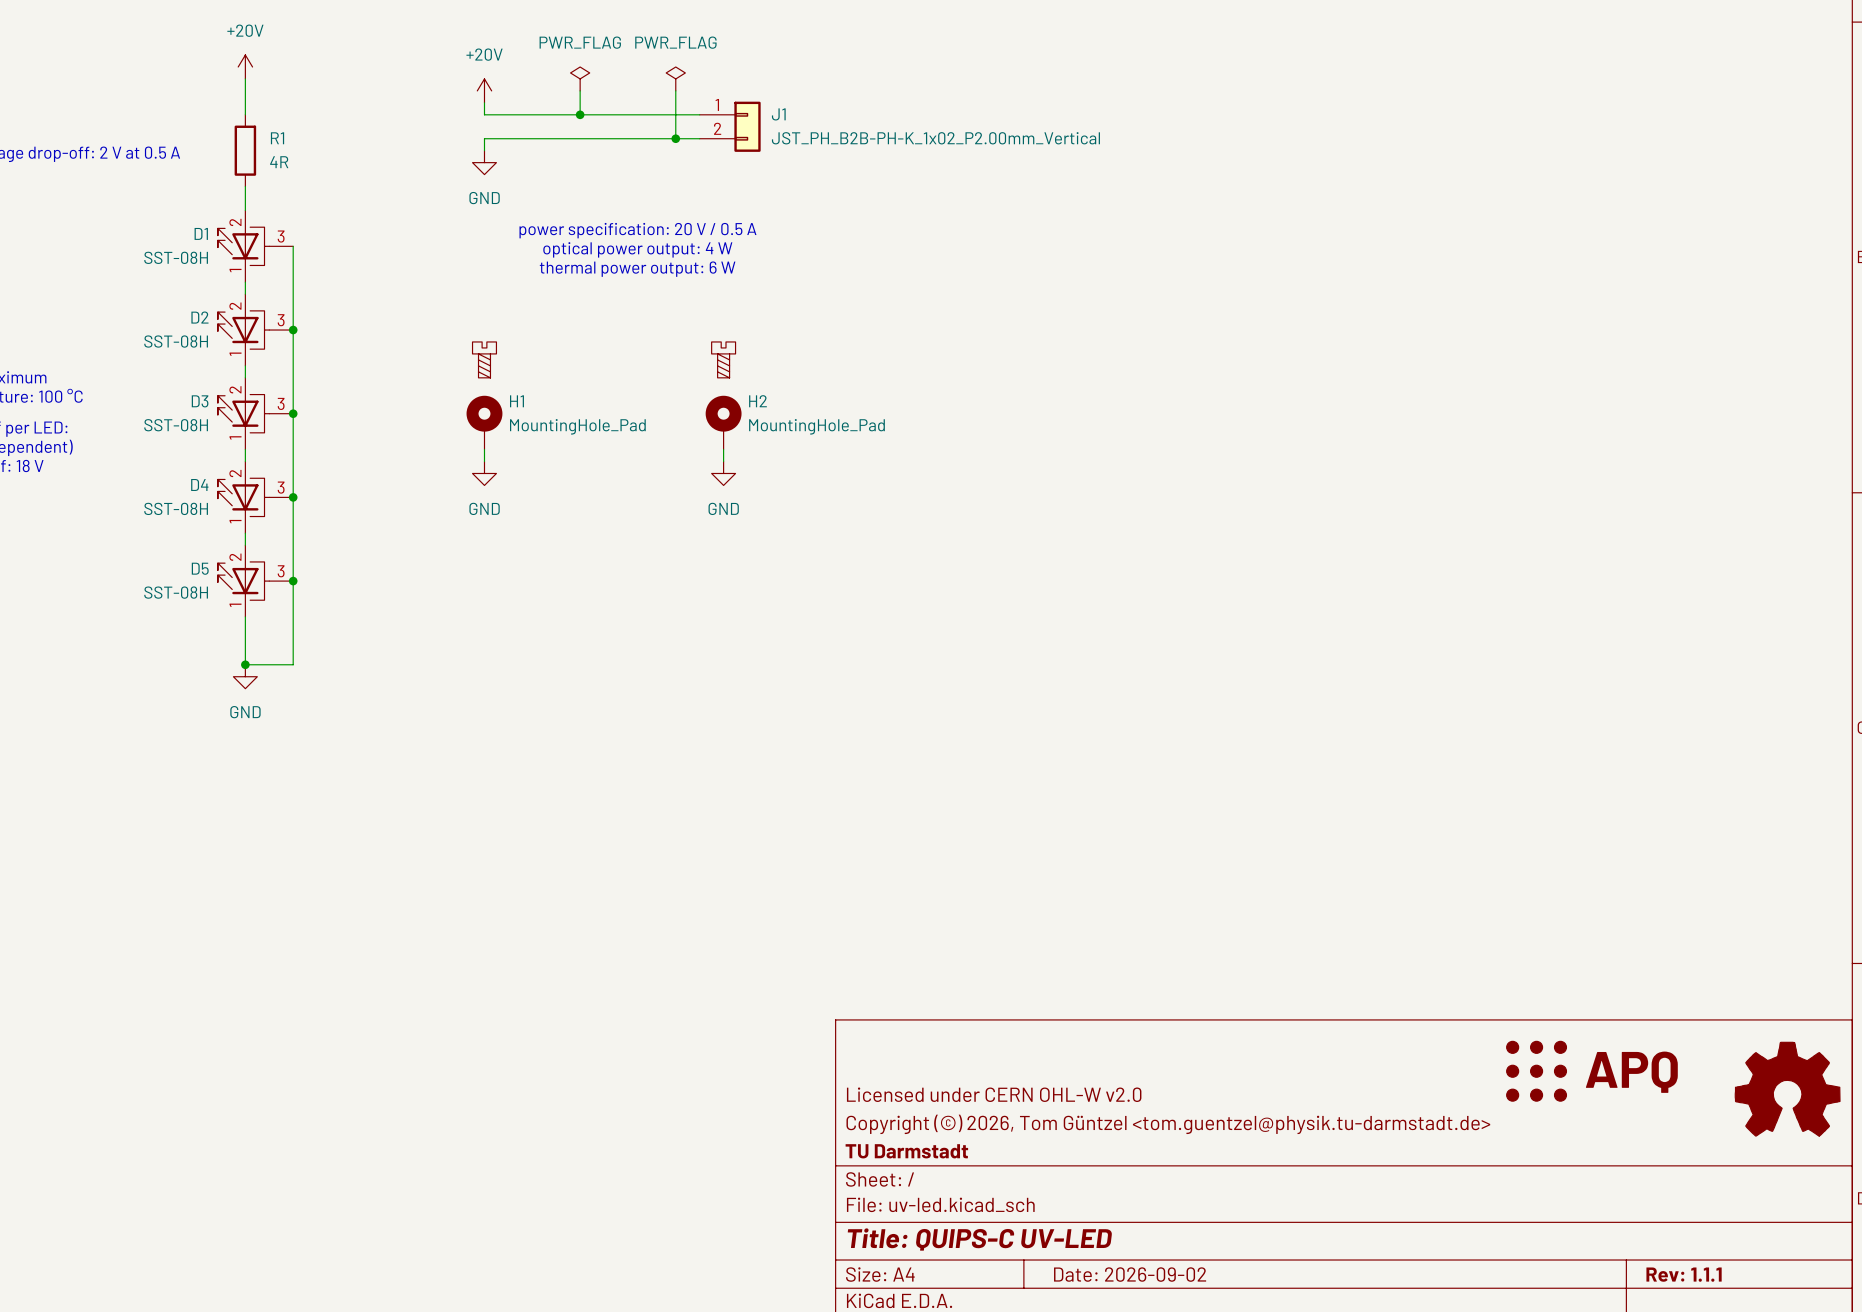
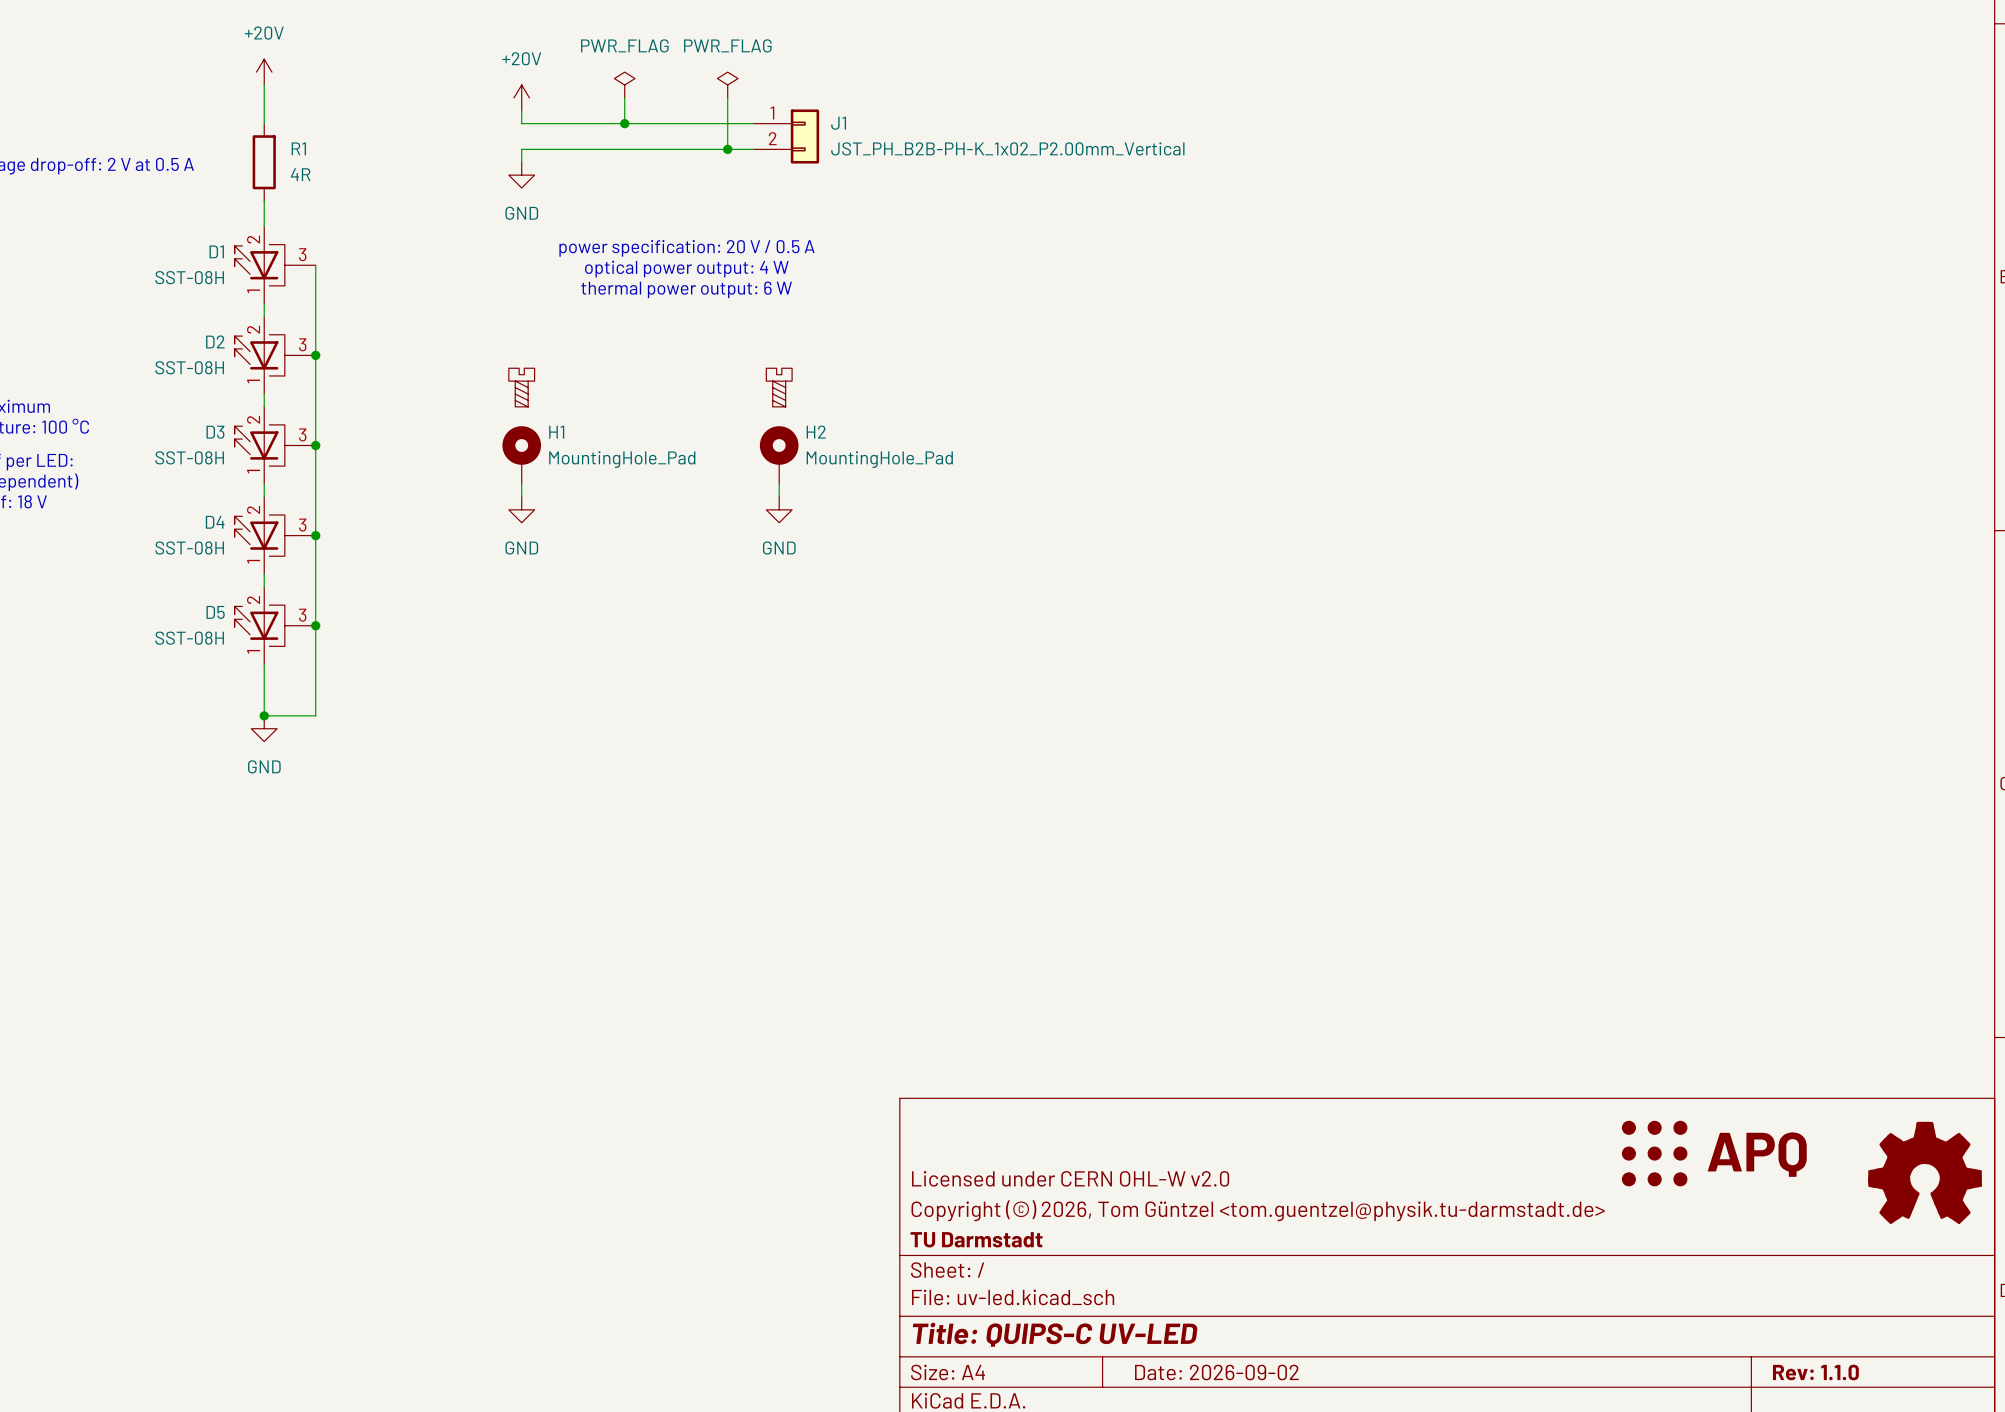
title block: Rev: 1.1.1 (1684, 1274) -> Rev: 1.1.0 (1815, 1372)

